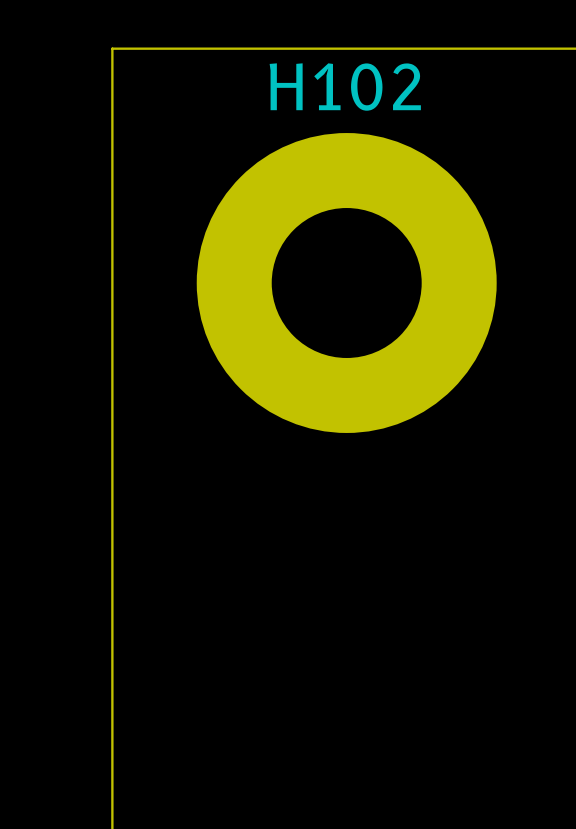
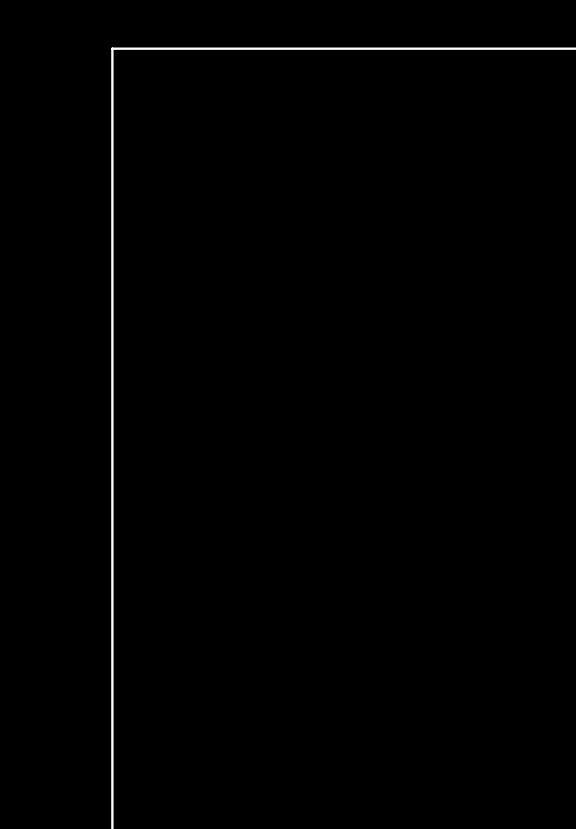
H102: (346, 283) -> none

